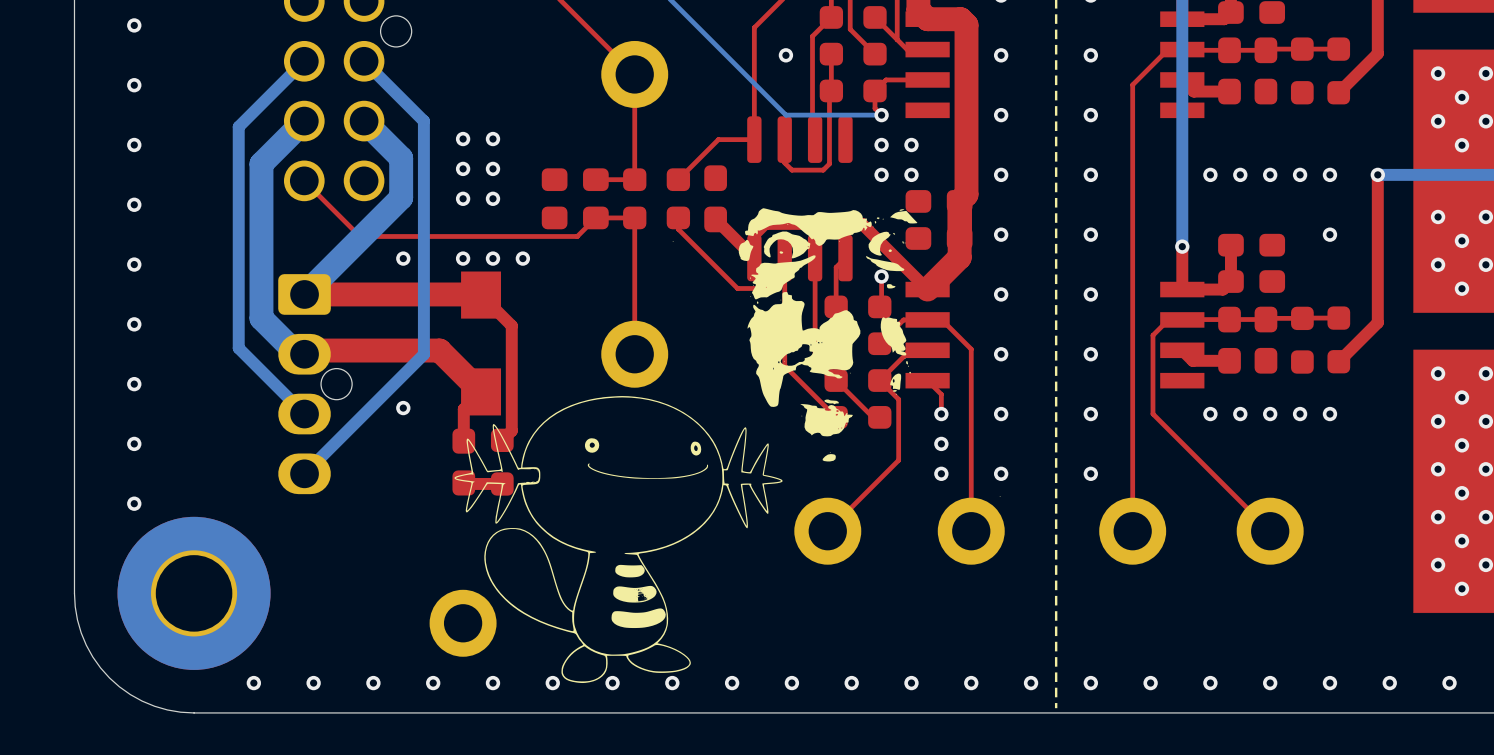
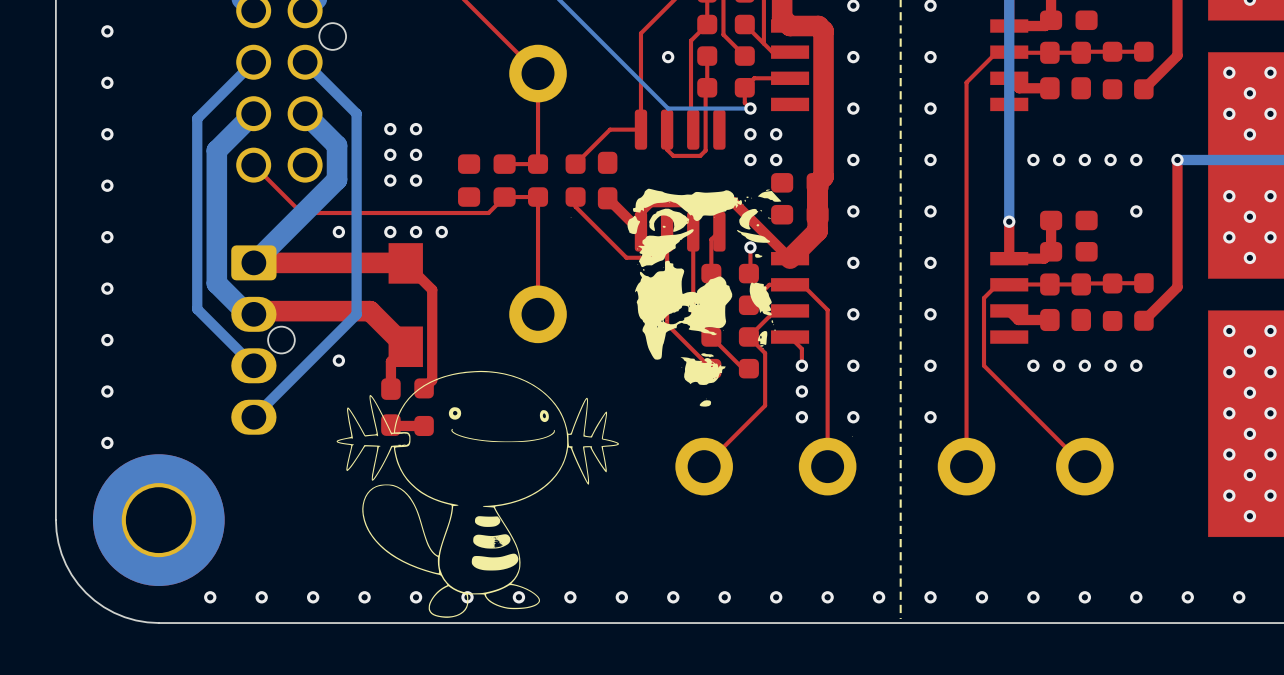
drawing position: (618, 539) -> (477, 494)
part: (463, 623) -> none

